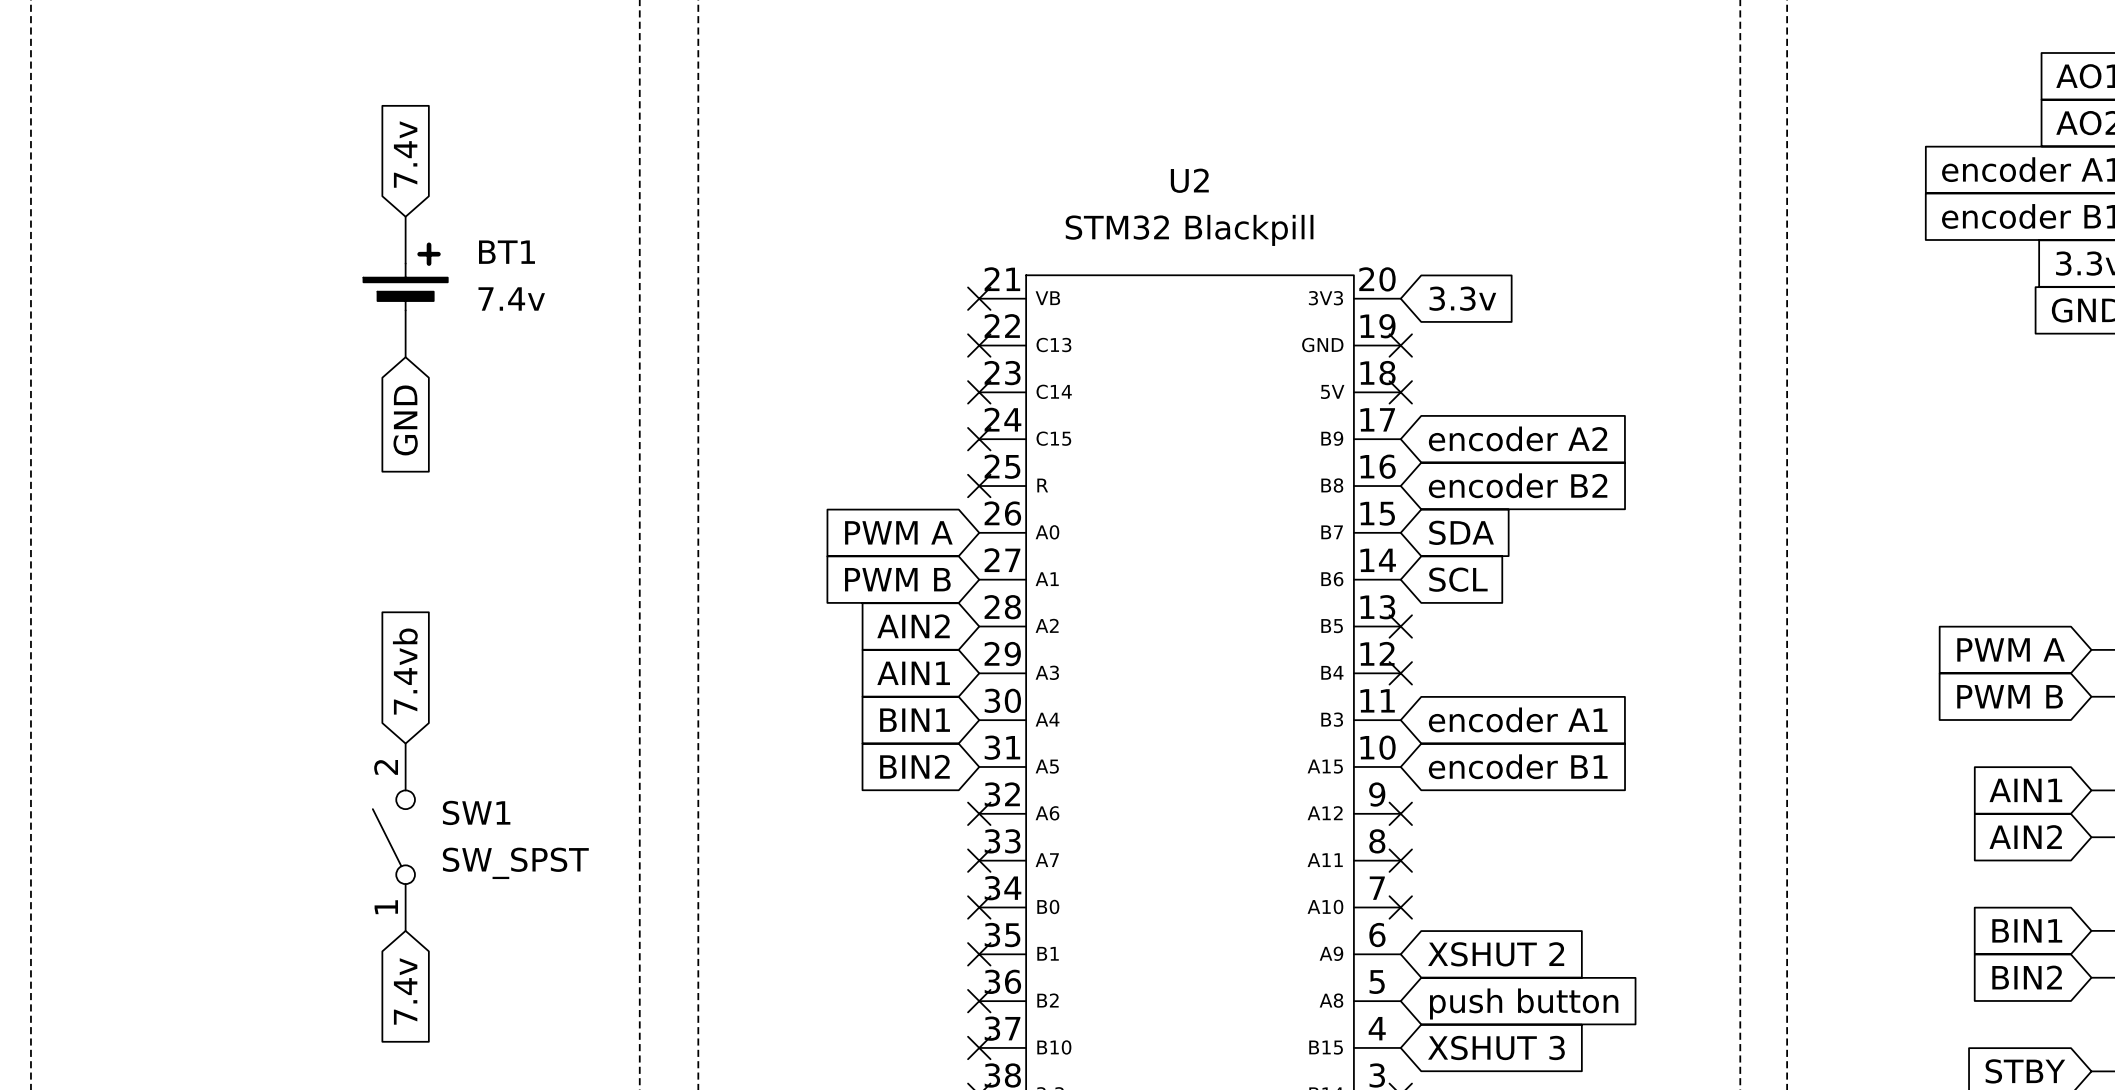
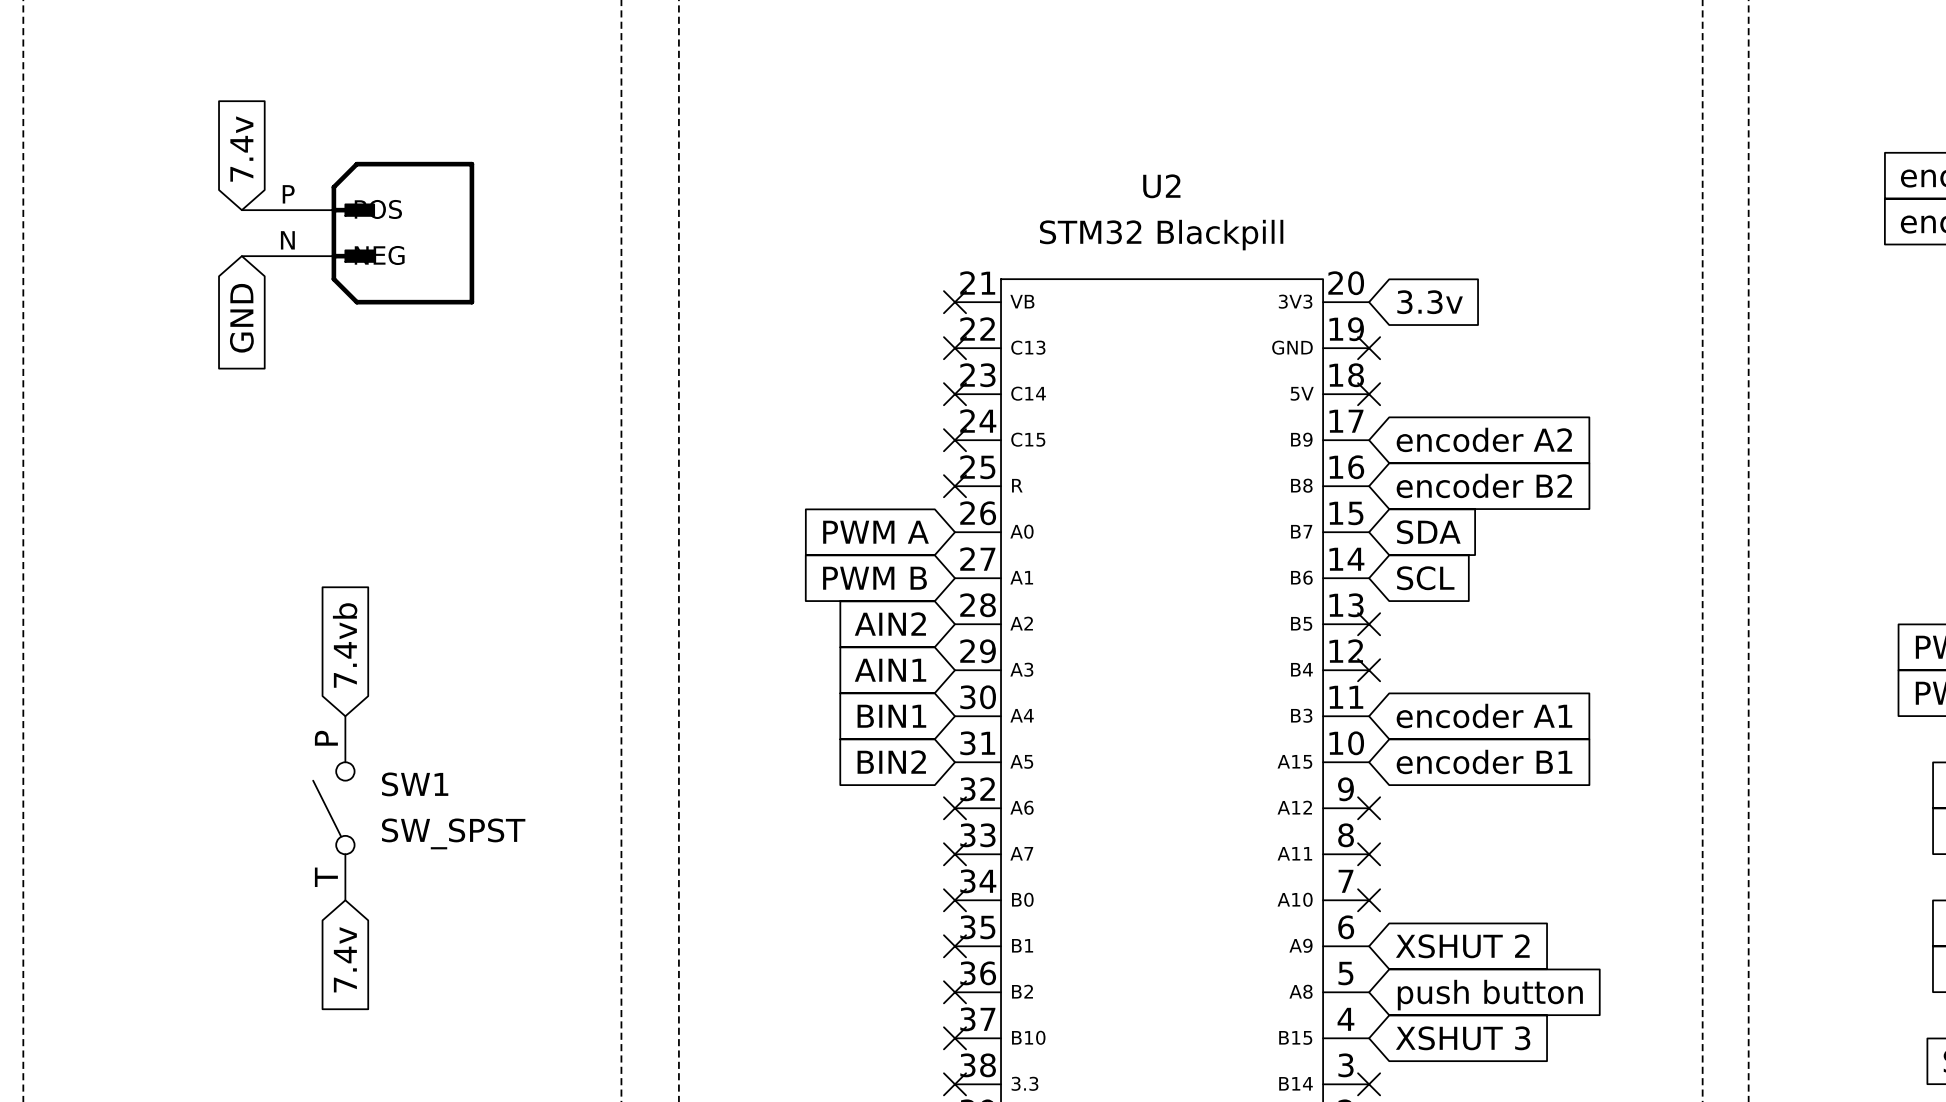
global label position: 7.4v (405, 154) -> 7.4v (241, 149)
part: none -> (358, 233)
BT1: 7.4v (405, 286) -> none
global label position: GND (405, 420) -> GND (241, 318)
global label position: 7.4vb (405, 671) -> 7.4vb (345, 645)
SW1 pin number: 2 (386, 767) -> P (326, 738)
SW1 position: (393, 837) -> (333, 808)
SW1 pin number: 1 (386, 907) -> T (326, 877)
global label position: 7.4v (405, 991) -> 7.4v (345, 959)

